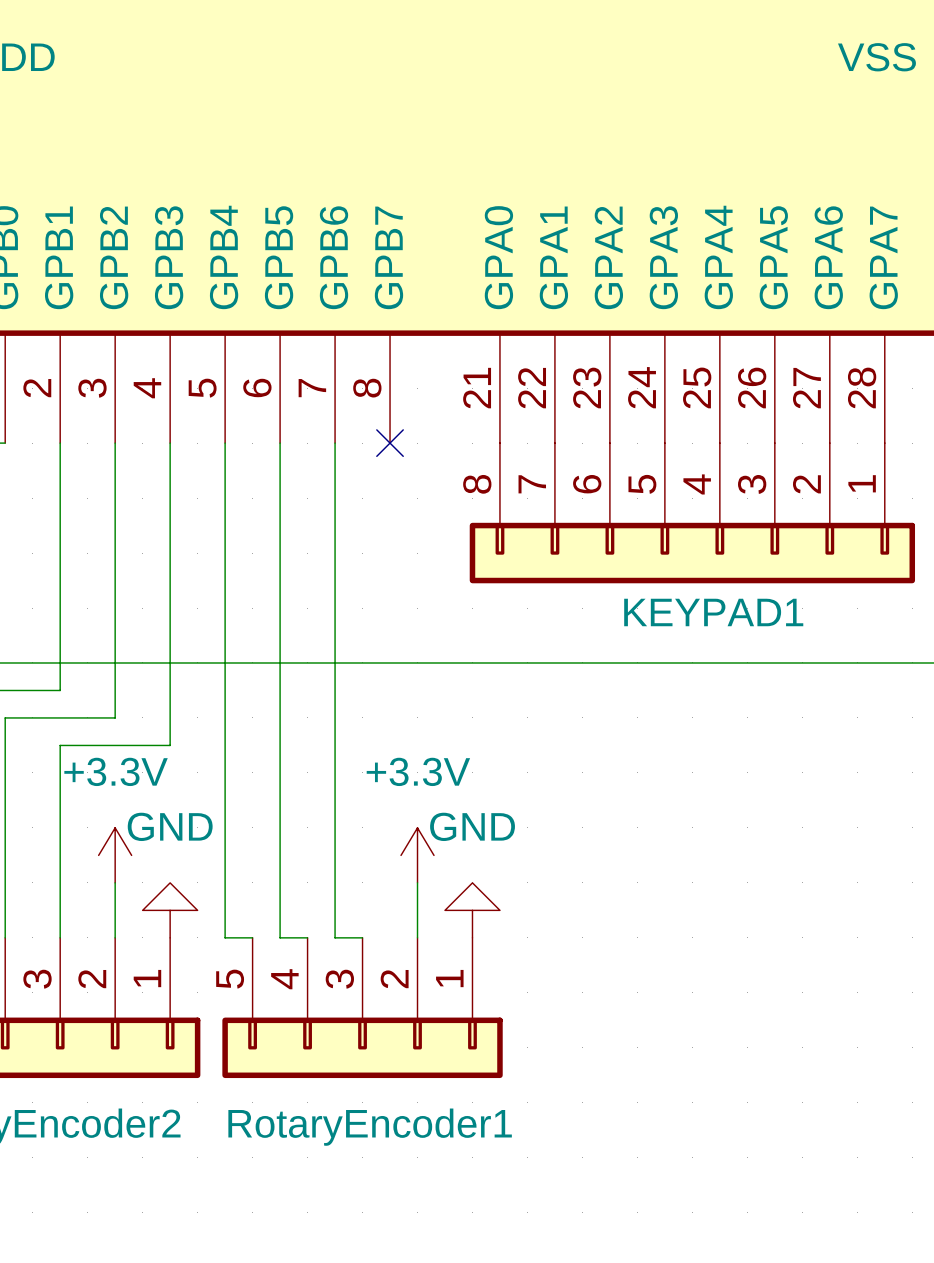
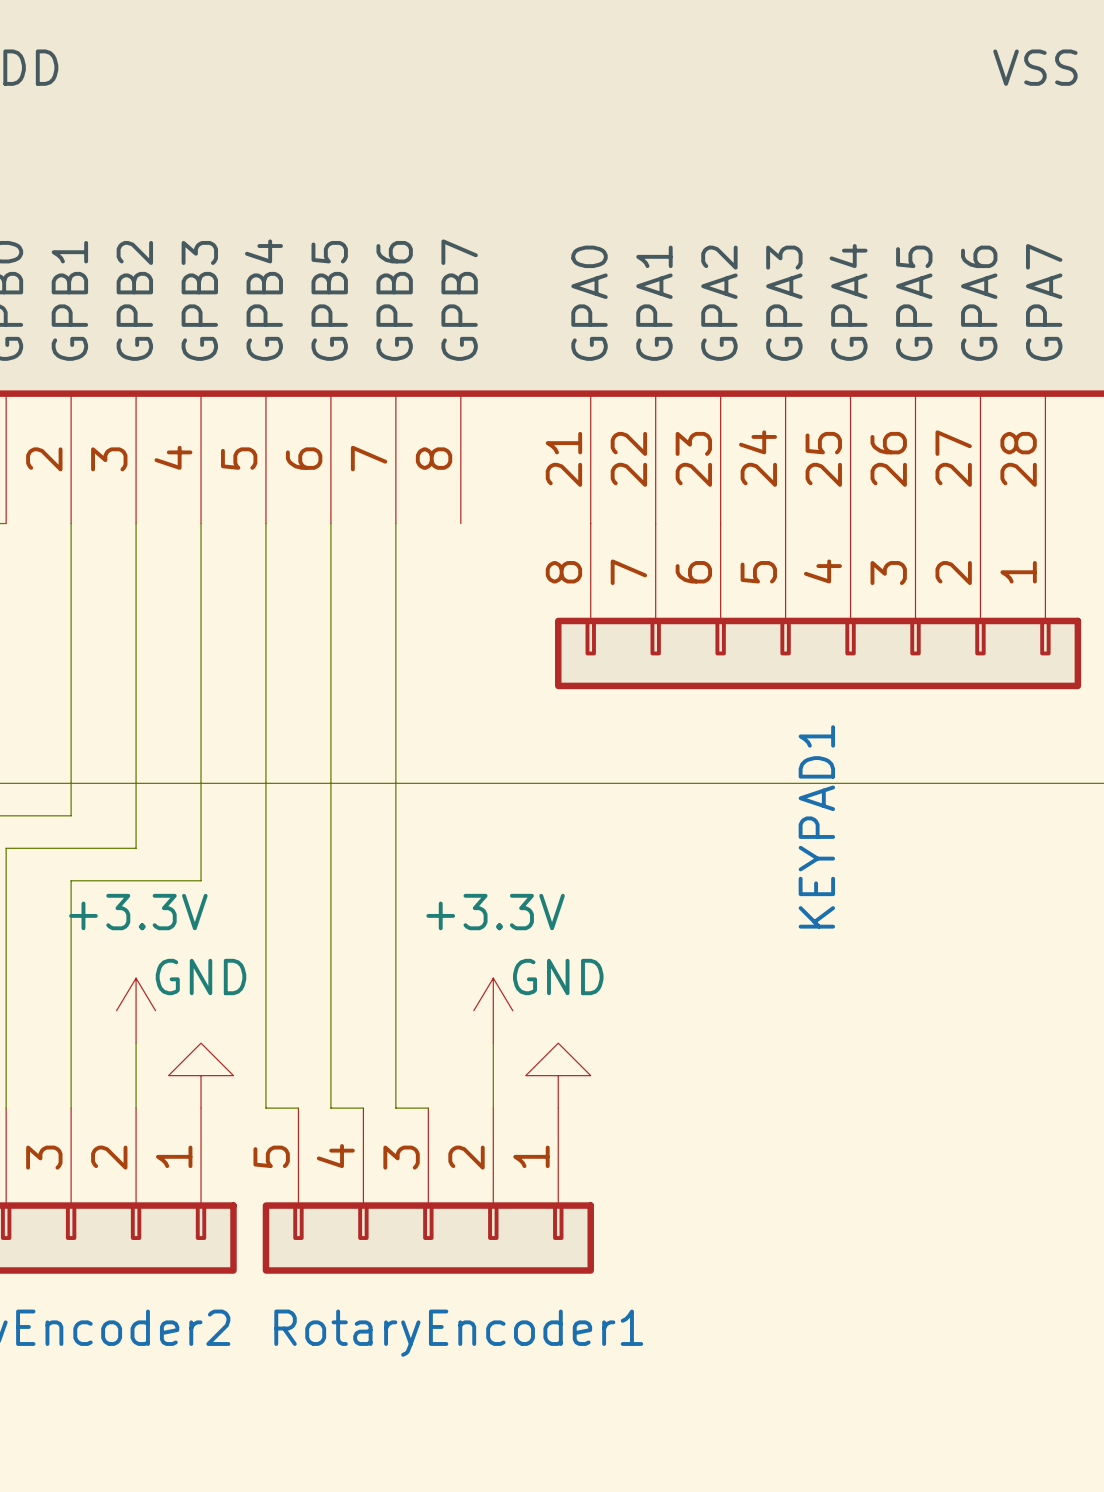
no-connect mark: (390, 443) -> none
KEYPAD1 name rotation: 0° (713, 612) -> 90° counterclockwise (816, 826)

